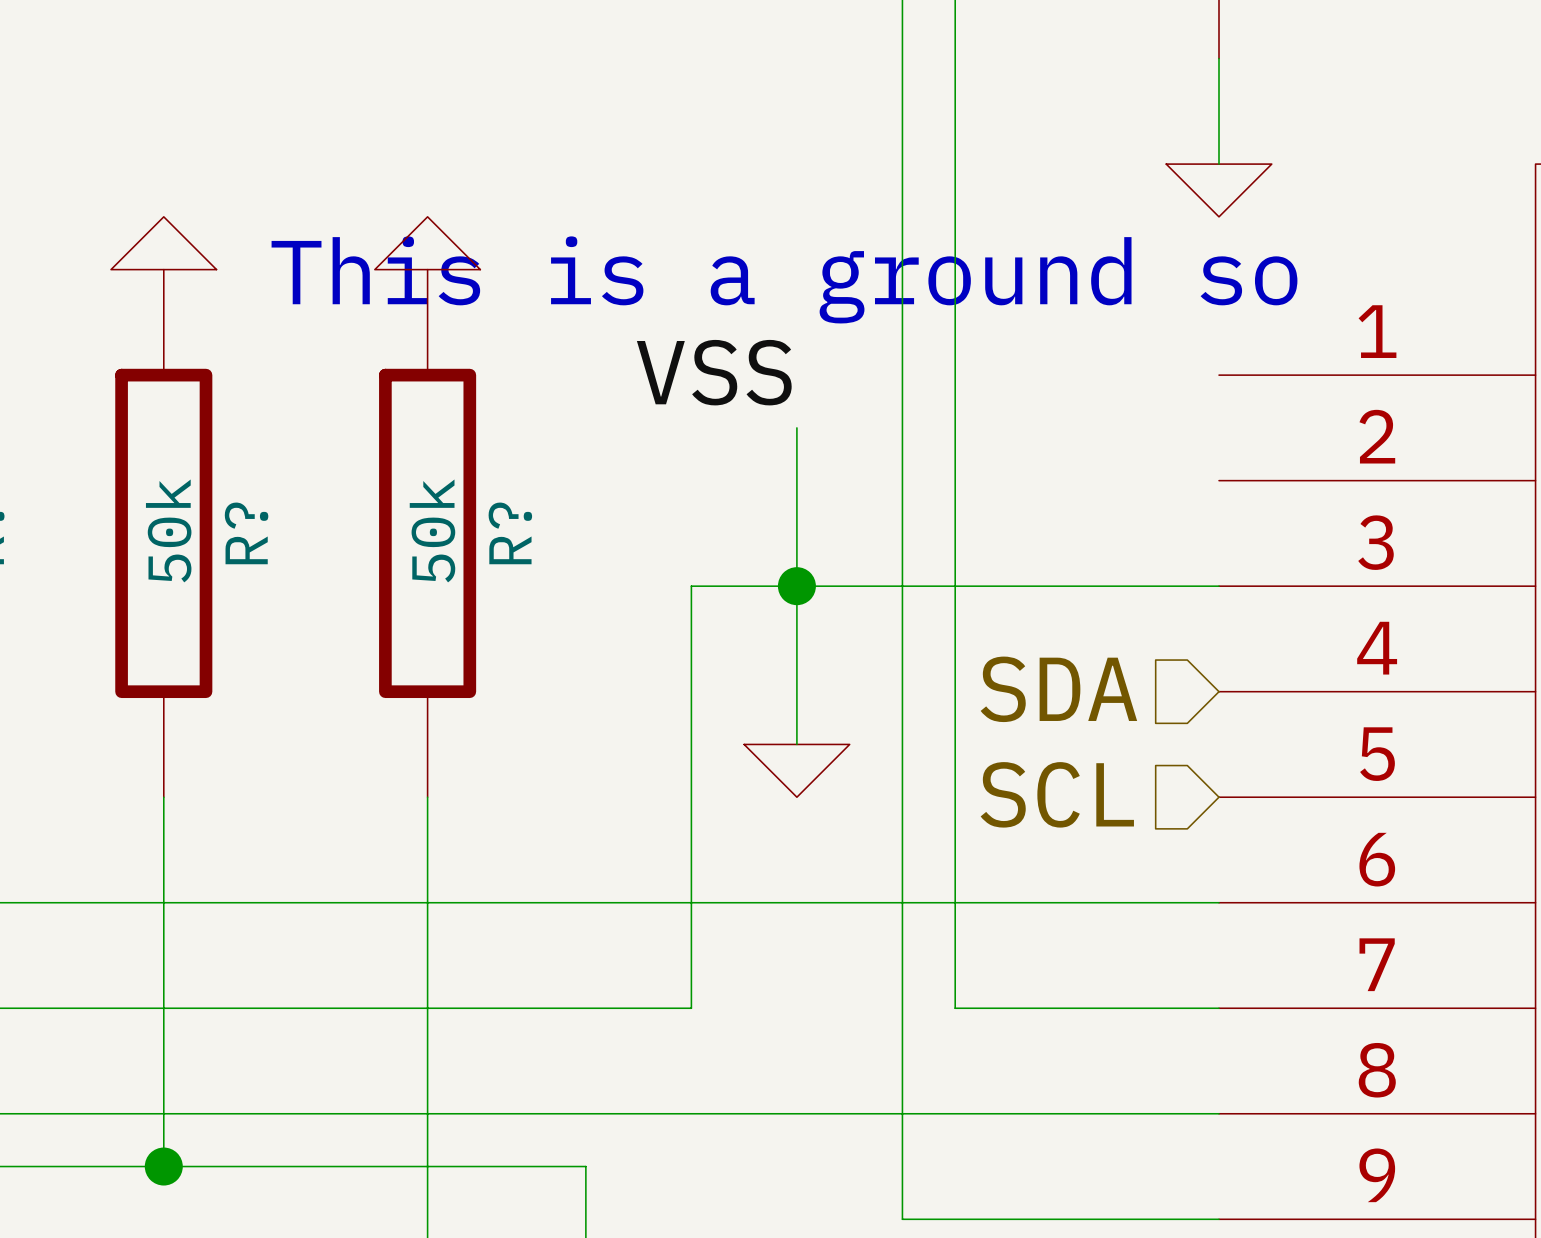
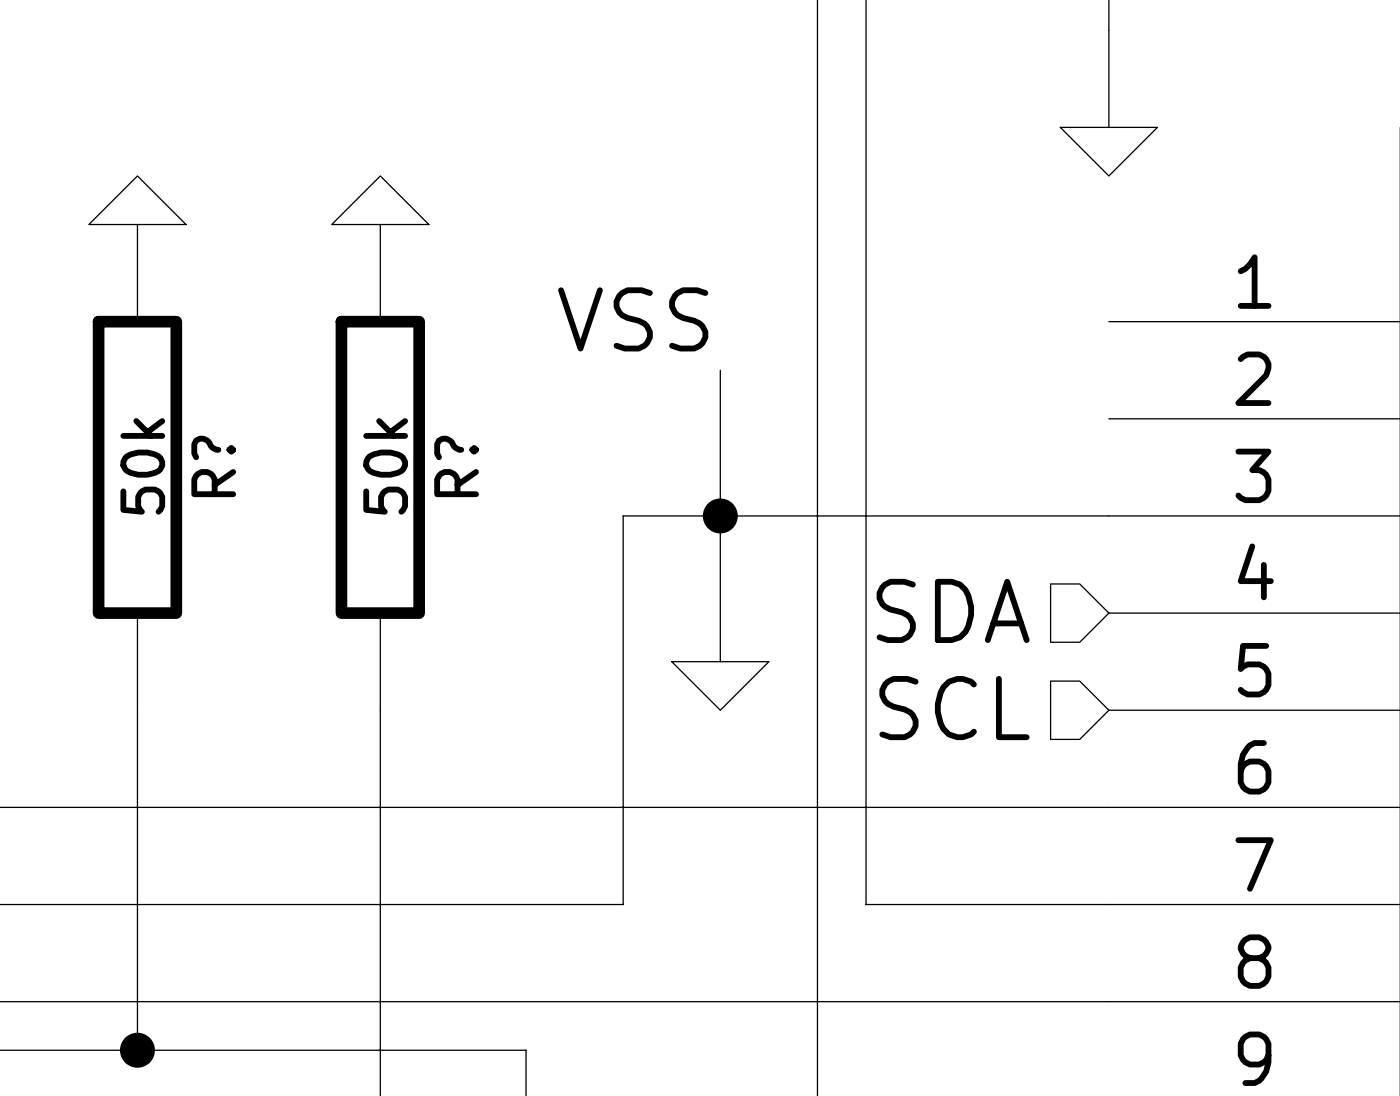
text: This is a ground so (784, 279) -> none

